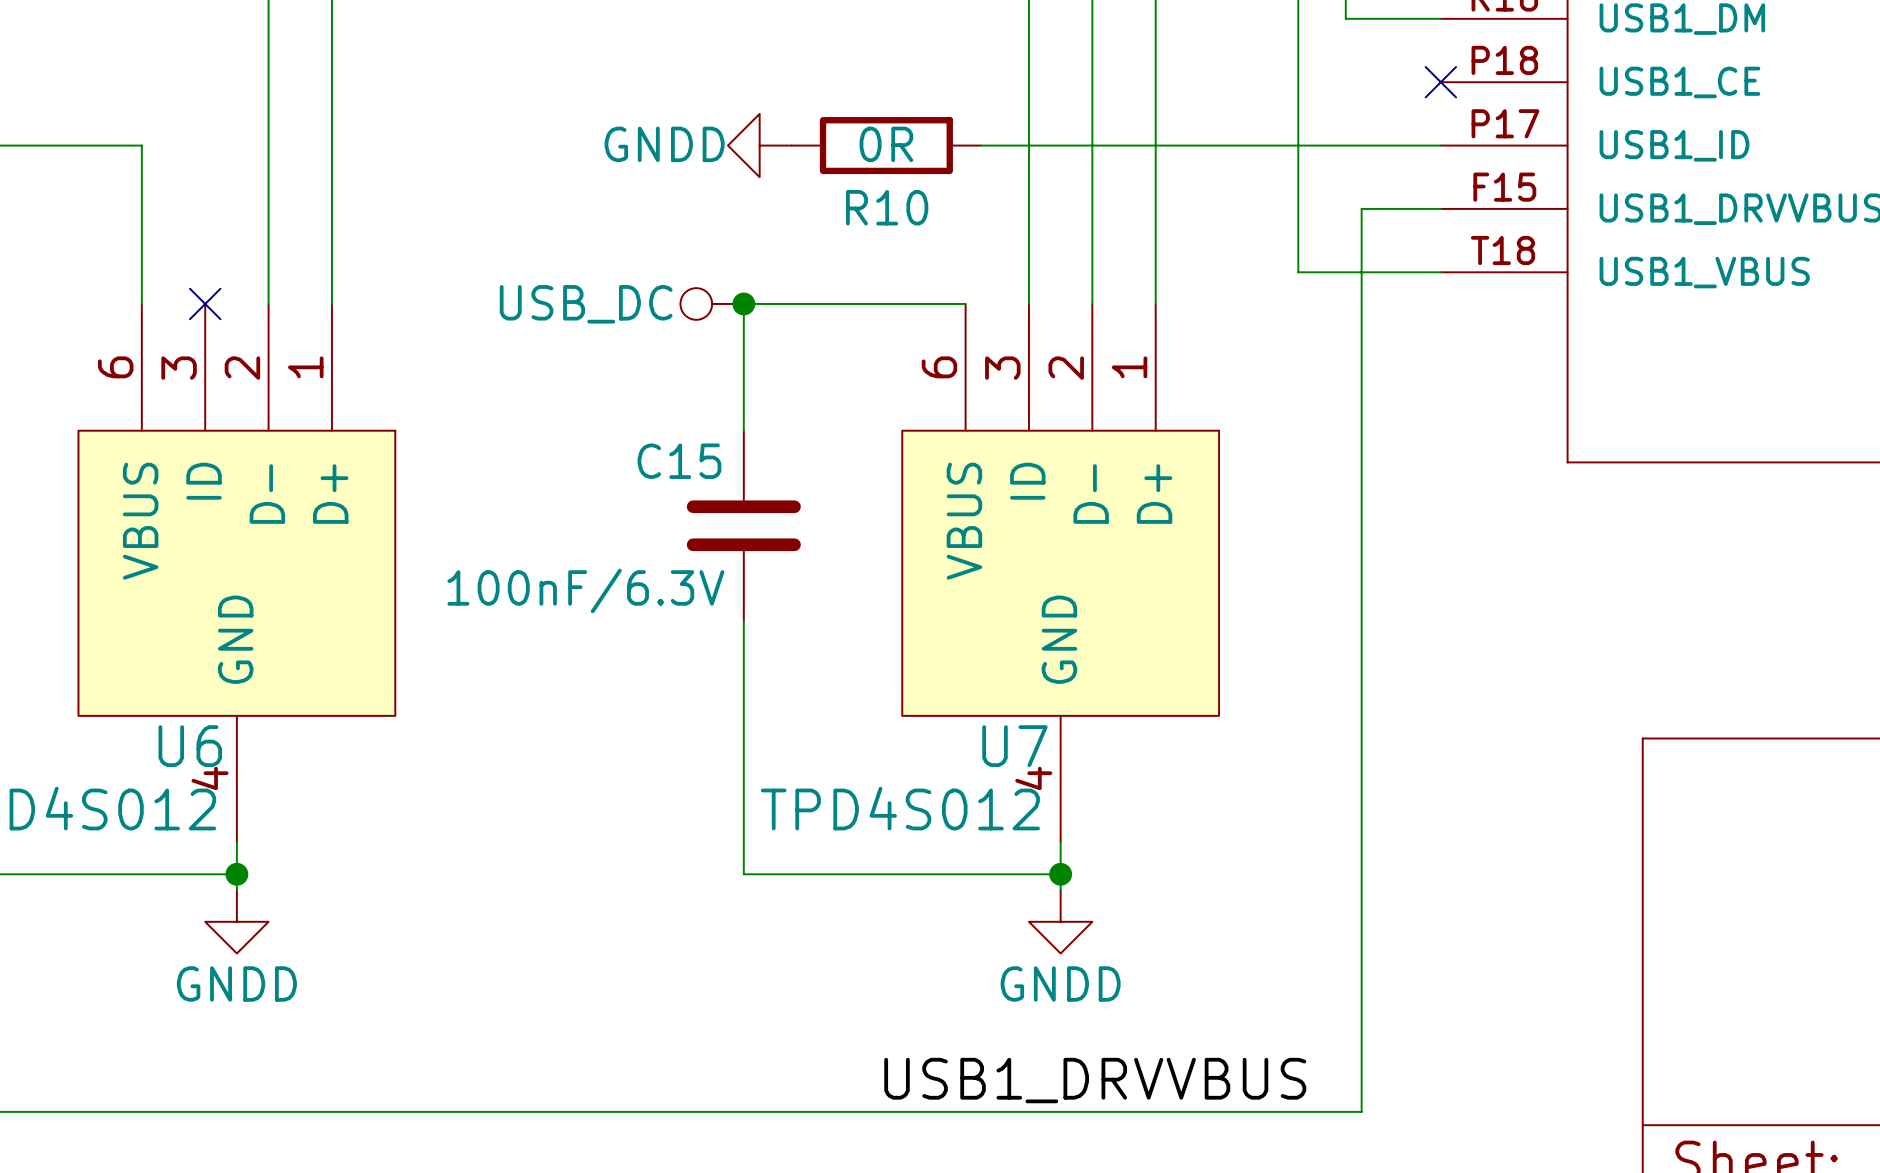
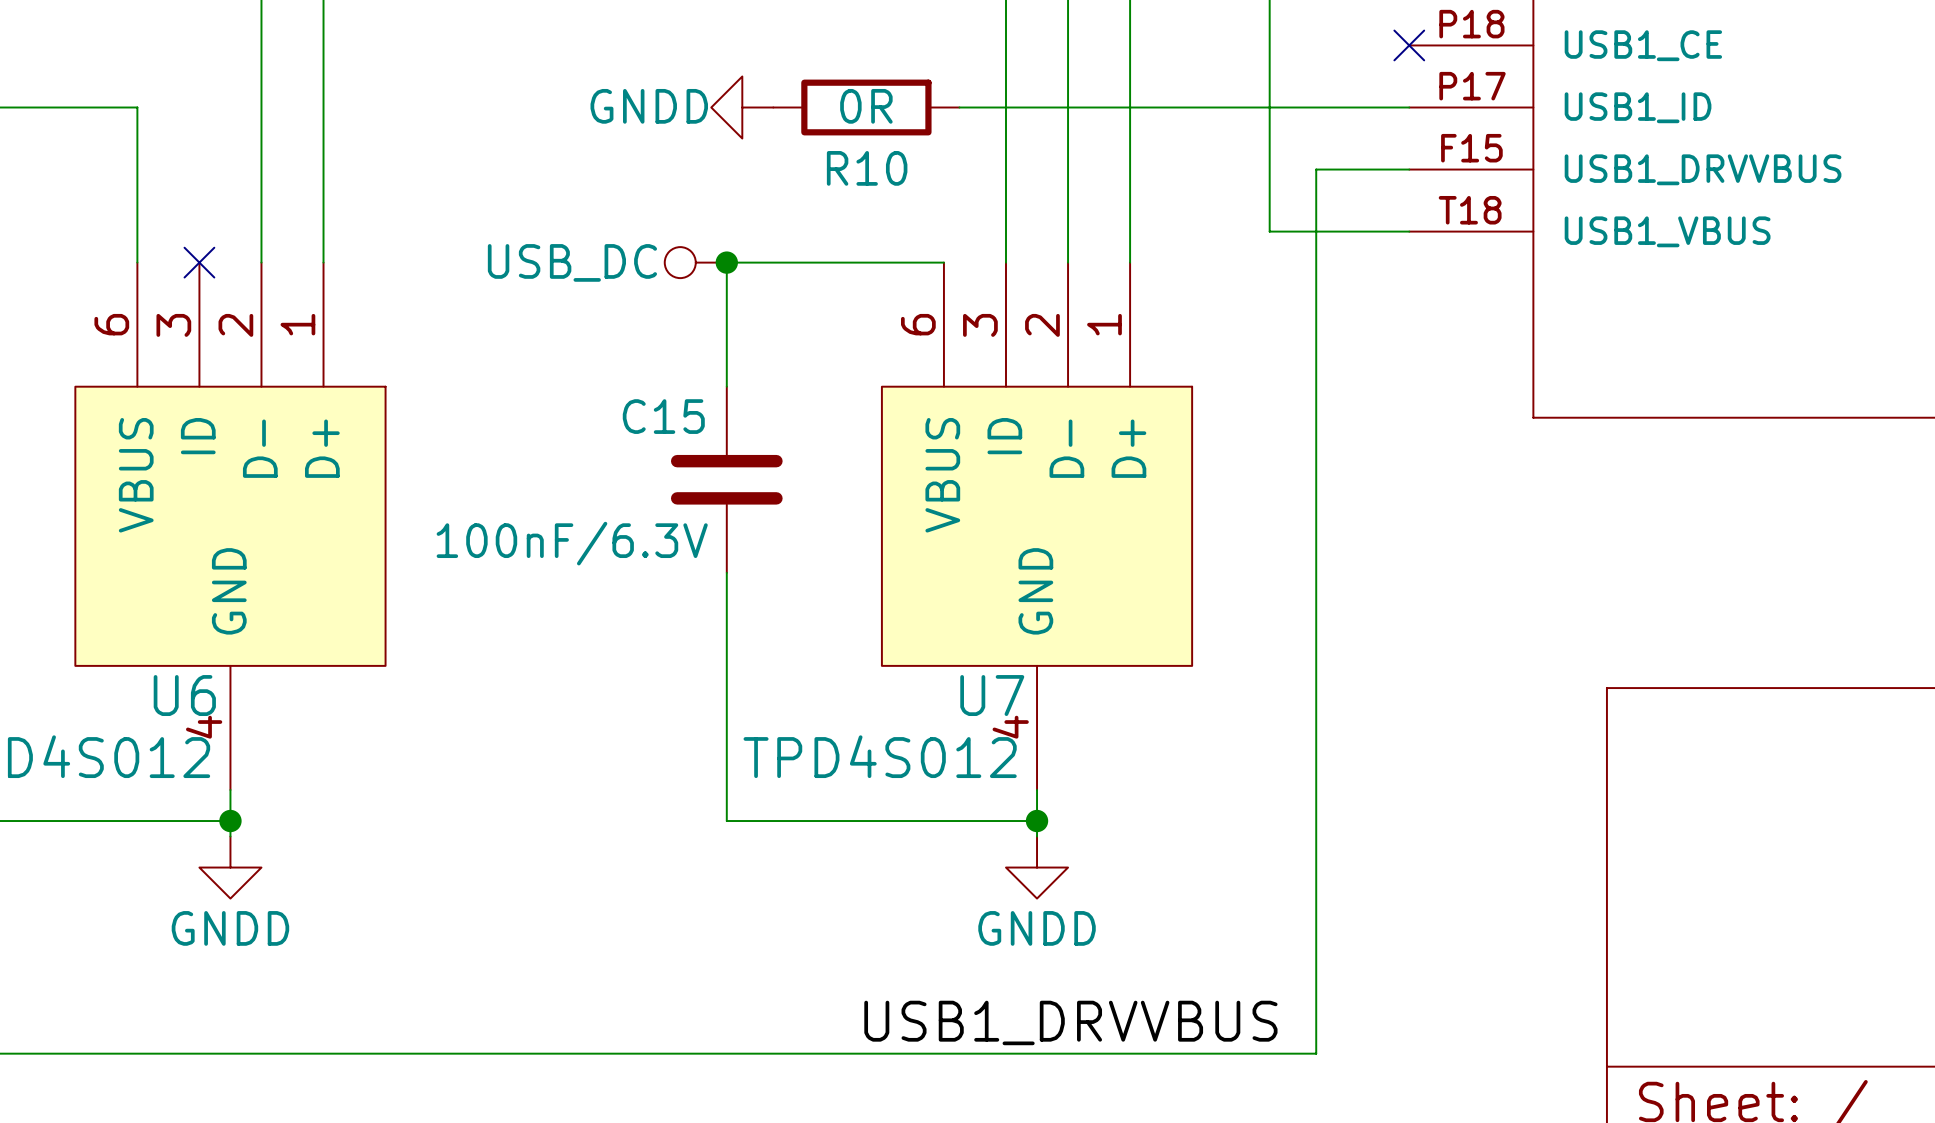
wire: (1361, 208) (1361, 1111) (1345, 1111) -> (1331, 169) (1316, 169) (1316, 1053)

